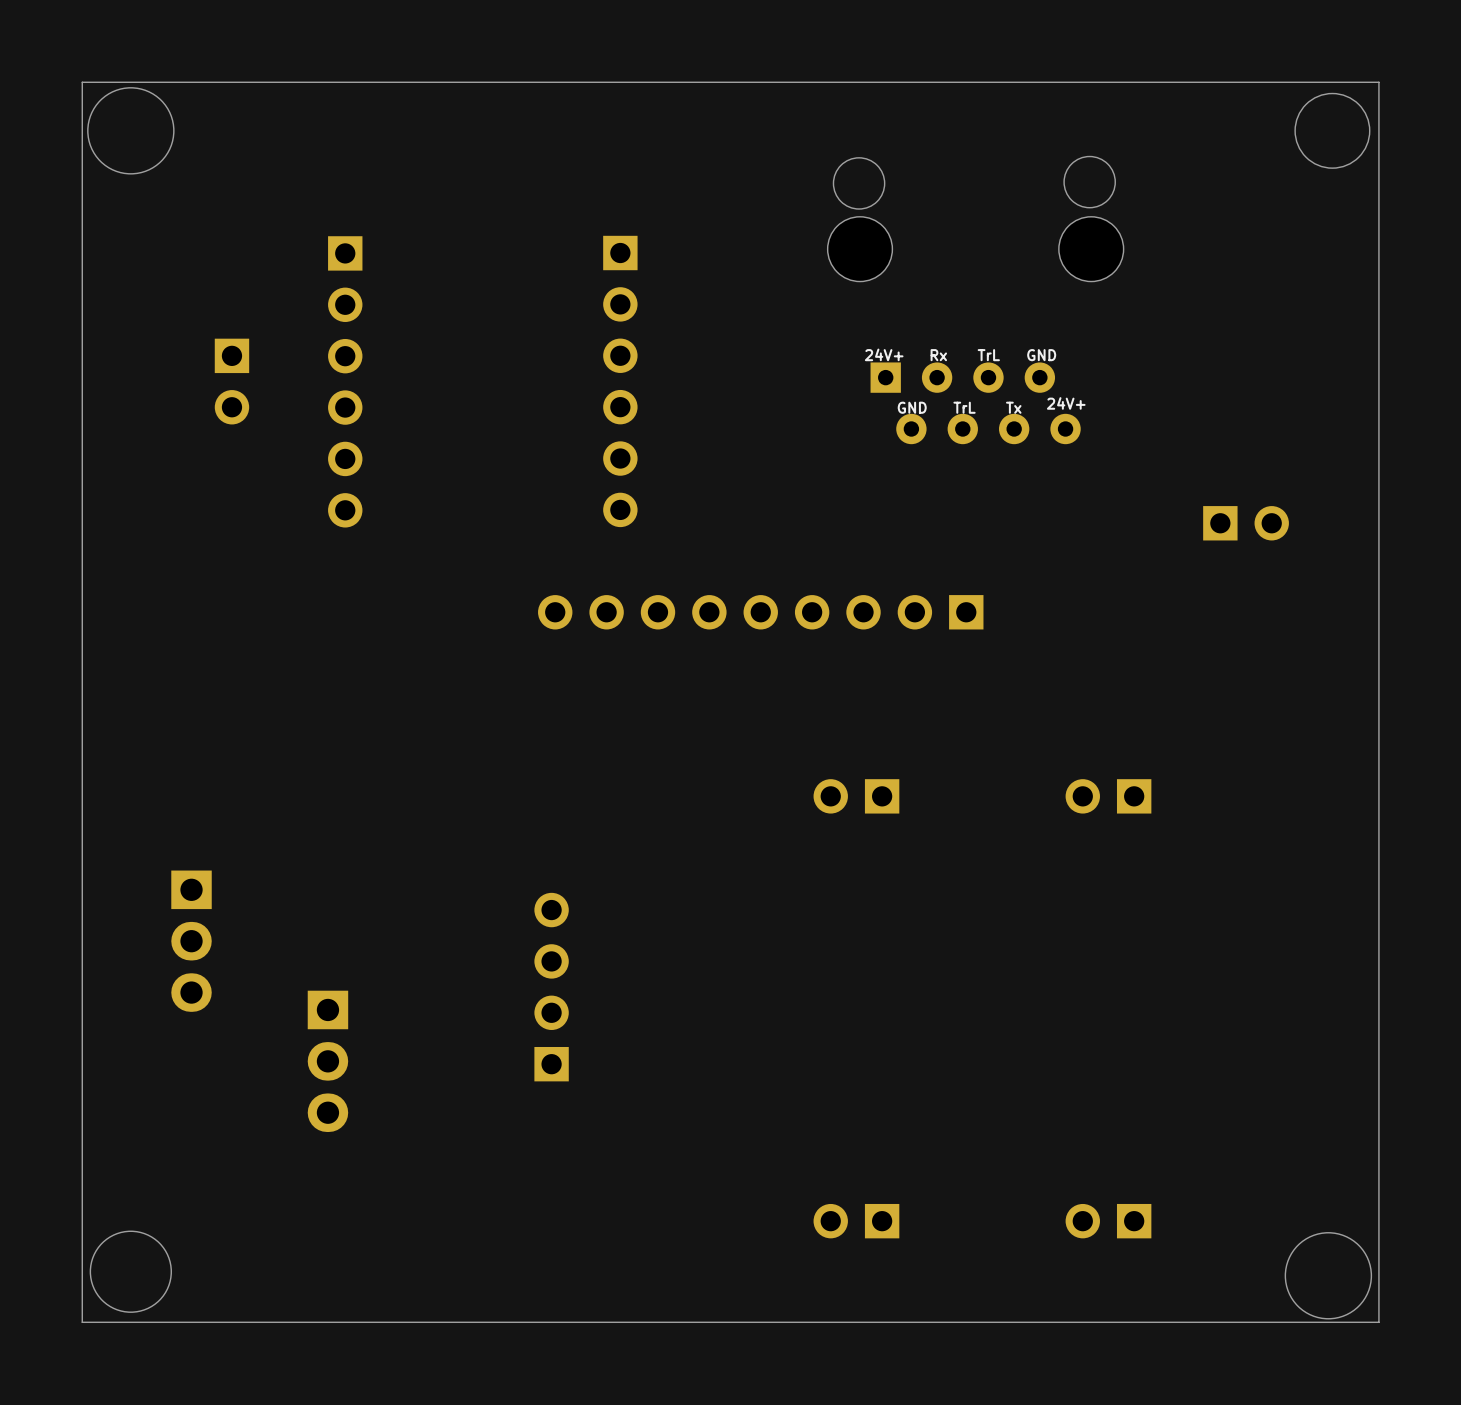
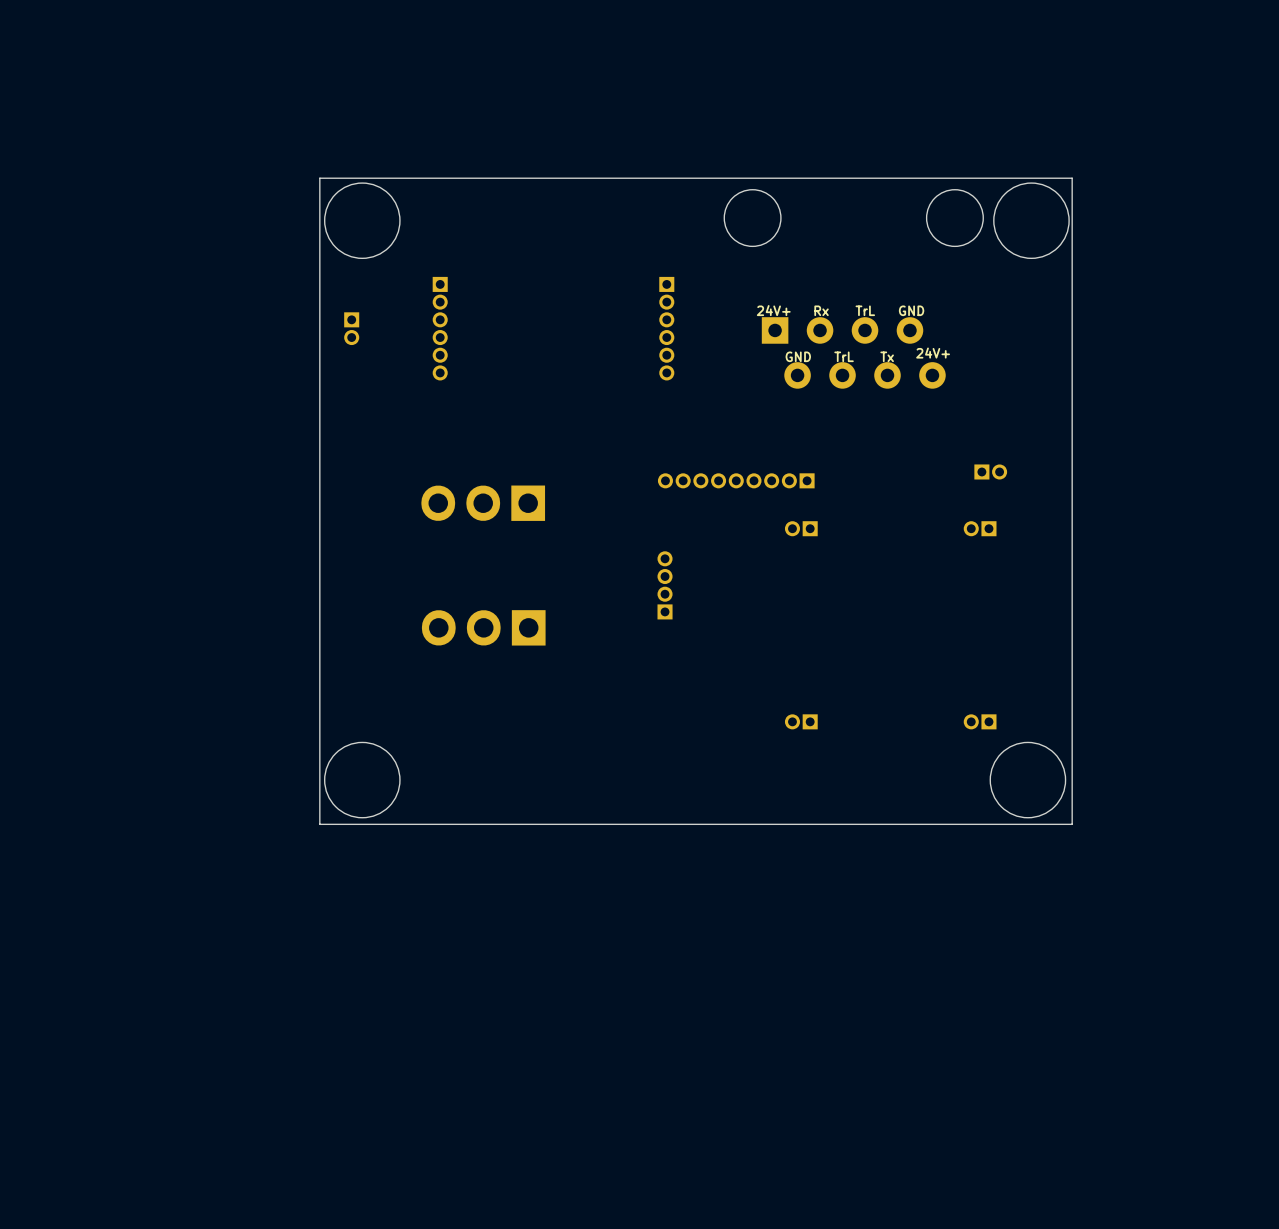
board edge: (1378, 82) (82, 82) (82, 1322) (1378, 1322) (1378, 82) -> none
round board edge: [1294, 93, 1371, 169] -> none
round board edge position: (130, 130) -> (362, 220)
round board edge: [1063, 156, 1116, 209] -> none
round board edge: [832, 157, 886, 210] -> none
board edge: none -> (1072, 178) (319, 178) (319, 824) (1072, 824) (1072, 178)
round board edge: none -> [993, 182, 1070, 259]
part: none -> (351, 328)
part: none -> (440, 328)
part: none -> (666, 328)
part: (231, 381) -> none
part: (345, 381) -> none
part: (620, 381) -> none
part: (1246, 523) -> none
part: none -> (990, 471)
part: none -> (736, 480)
part: none -> (483, 503)
part: none -> (801, 528)
part: none -> (980, 528)
part: (760, 612) -> none
part: none -> (665, 585)
part: none -> (483, 627)
part: (856, 796) -> none
part: (1108, 796) -> none
part: none -> (801, 721)
part: none -> (980, 721)
round board edge: none -> [324, 742, 401, 819]
part: (191, 941) -> none
part: (551, 987) -> none
part: (327, 1061) -> none
part: (856, 1221) -> none
part: (1108, 1221) -> none
round board edge: [89, 1230, 172, 1313] -> none
round board edge position: (1328, 1275) -> (1027, 780)

